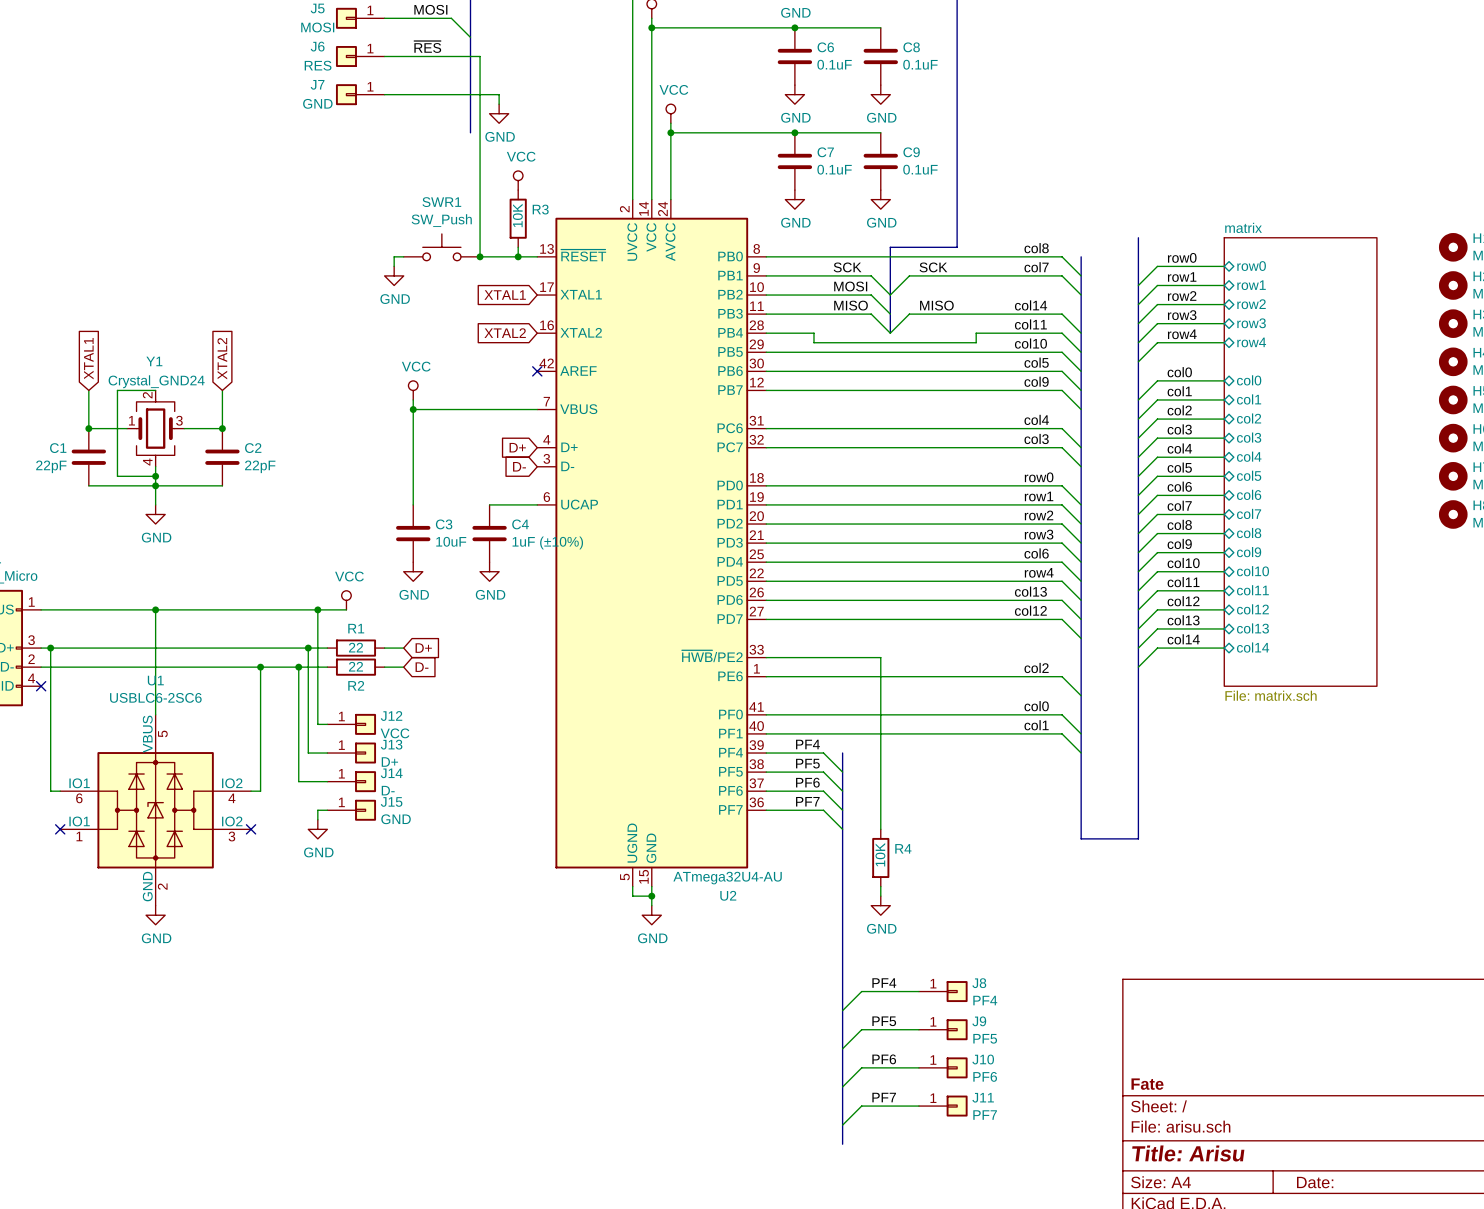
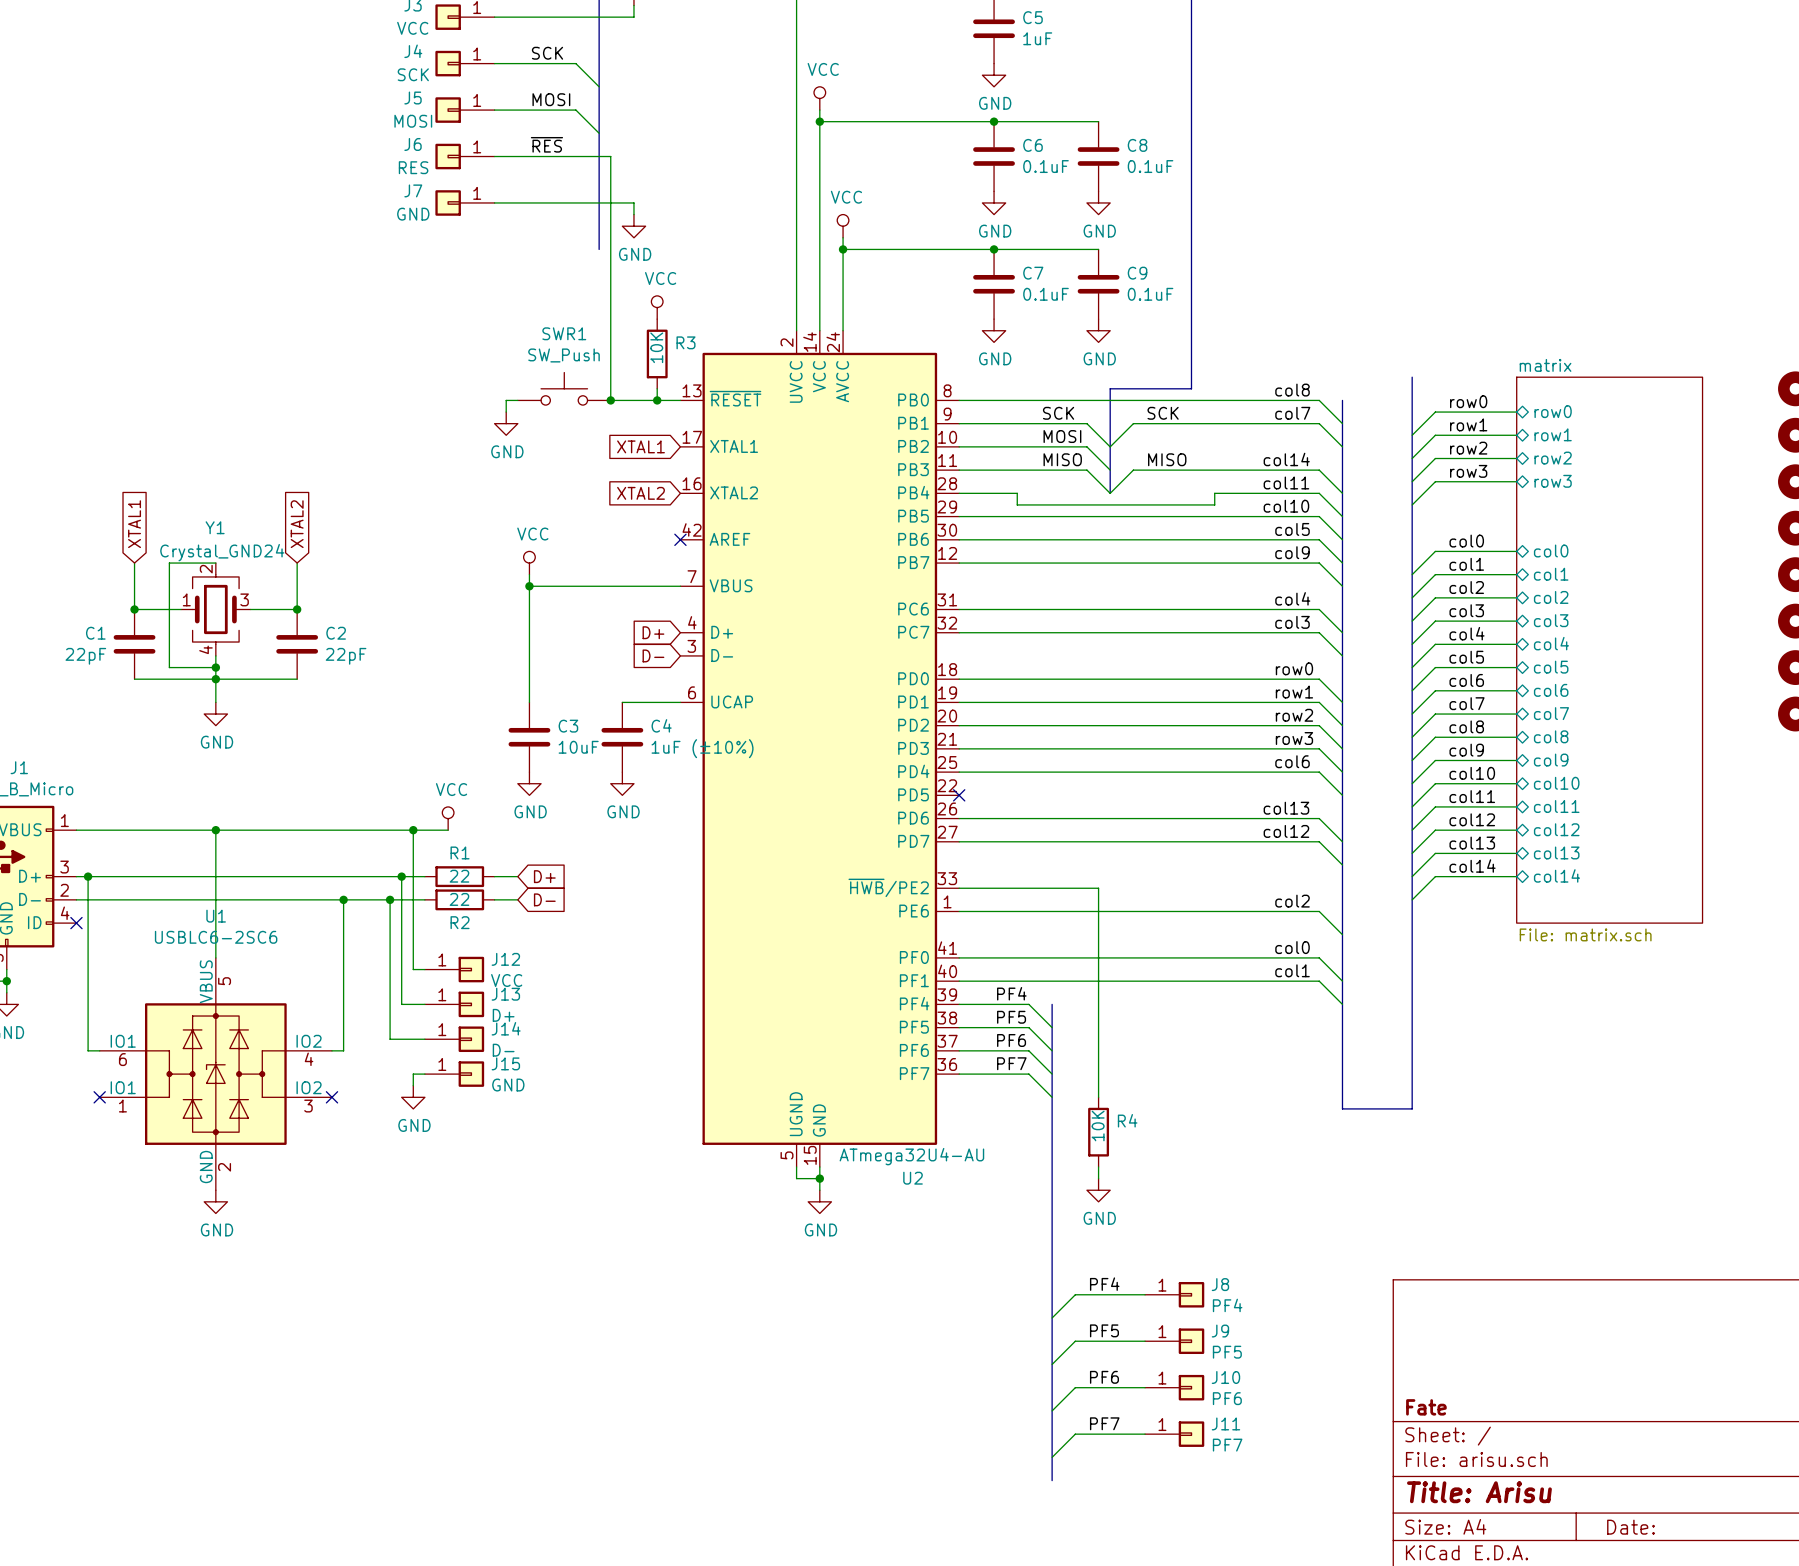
label: row4 (1182, 334) -> none
wire: (1224, 342) (1157, 342) (1138, 361) -> none
sheet pin: row4 (1251, 342) -> none
label: row4 (1039, 572) -> none
wire: (766, 581) (1062, 581) (1081, 600) -> none
no-connect mark: none -> (959, 795)

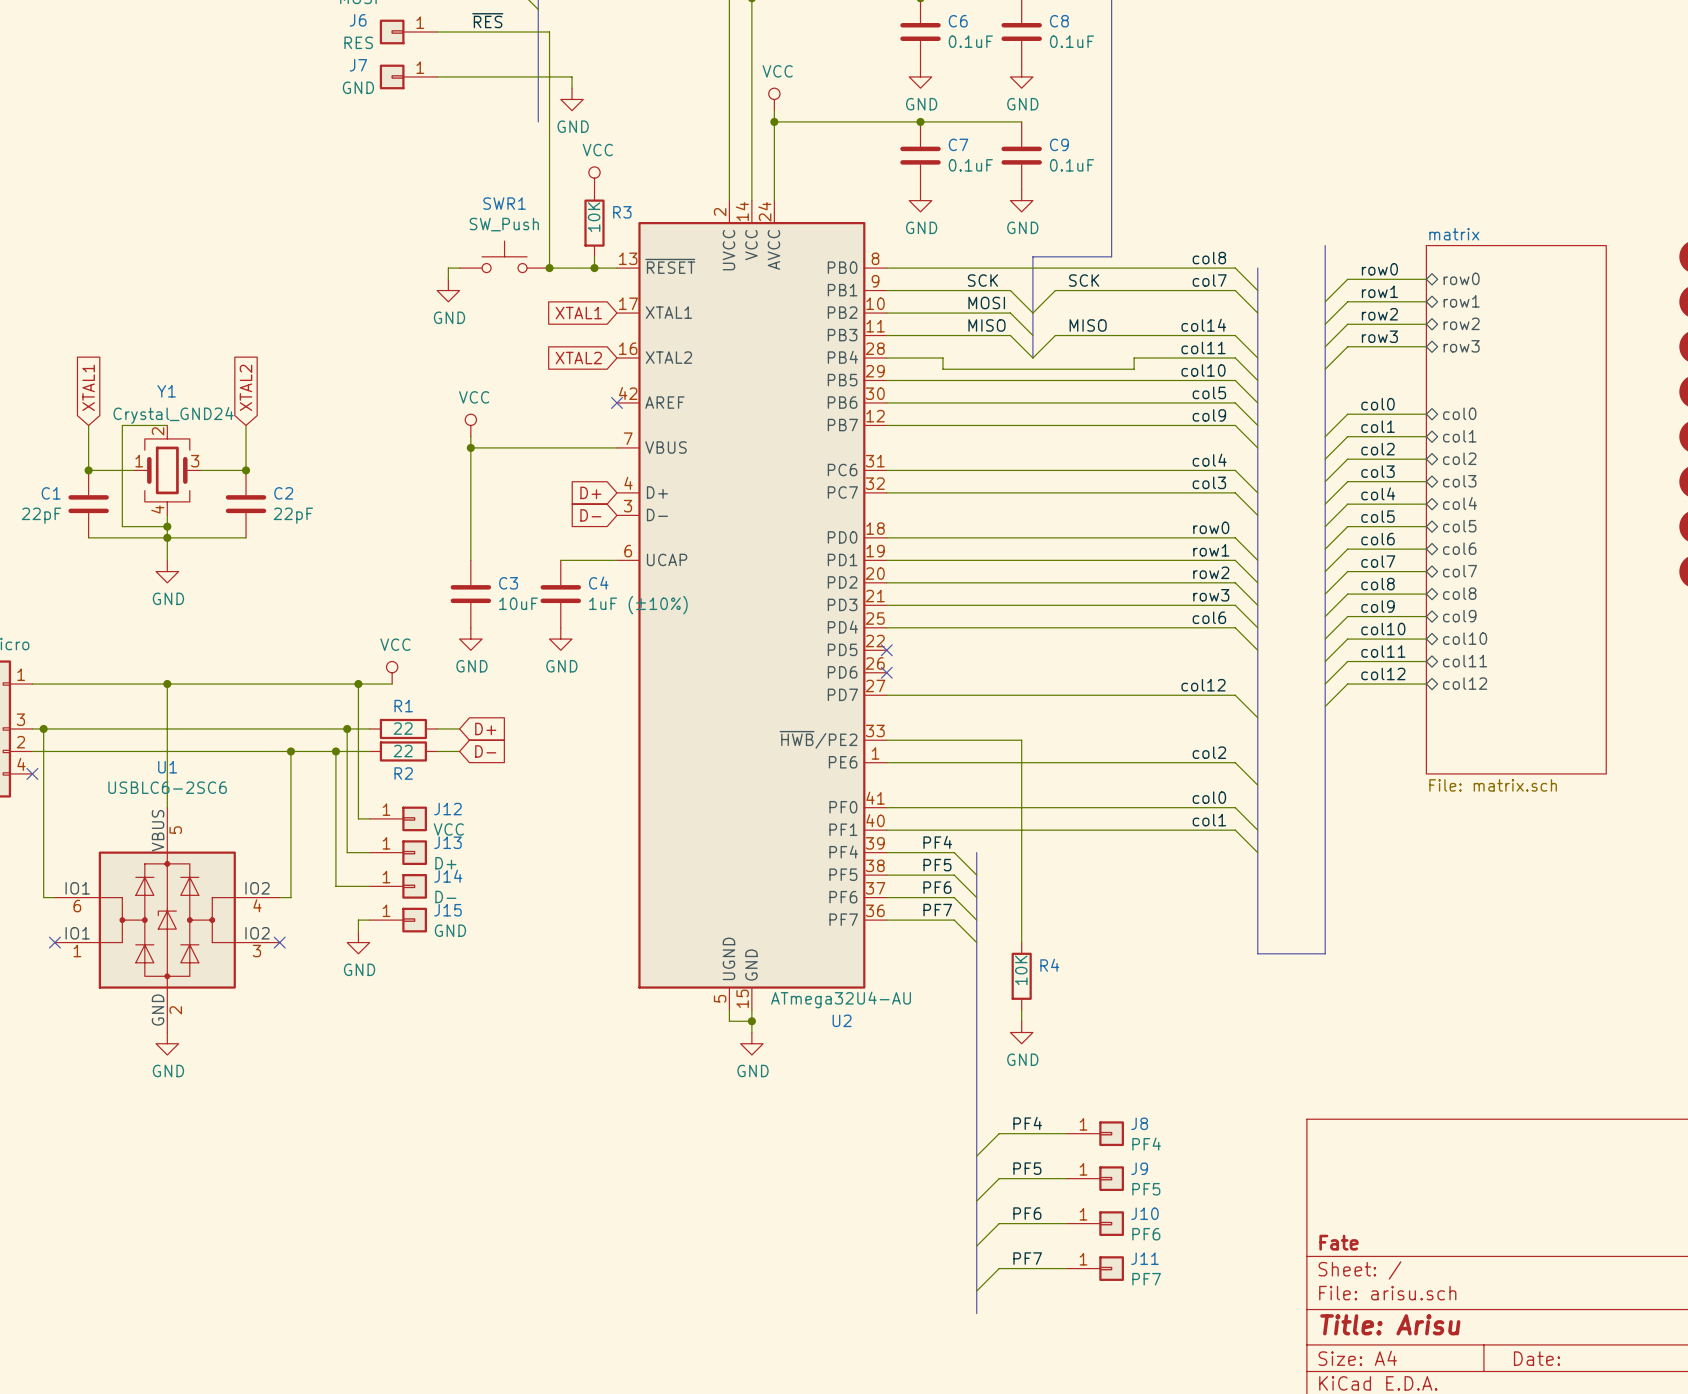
label: col13 (1286, 808) -> none
wire: (959, 818) (1319, 818) (1342, 841) -> none
no-connect mark: none -> (886, 672)
label: col13 (1472, 843) -> none
sheet pin: col13 (1556, 852) -> none
wire: (1516, 853) (1435, 853) (1412, 876) -> none
label: col14 (1472, 865) -> none
sheet pin: col14 (1556, 875) -> none
wire: (1516, 876) (1435, 876) (1412, 899) -> none

